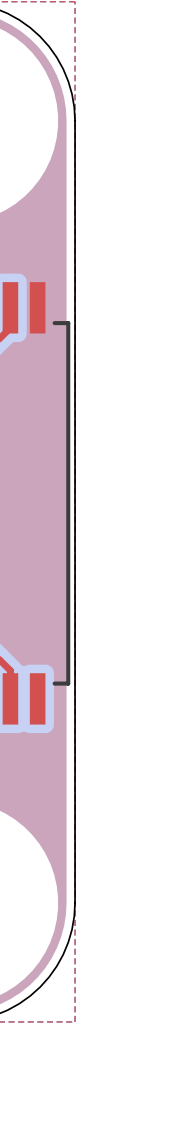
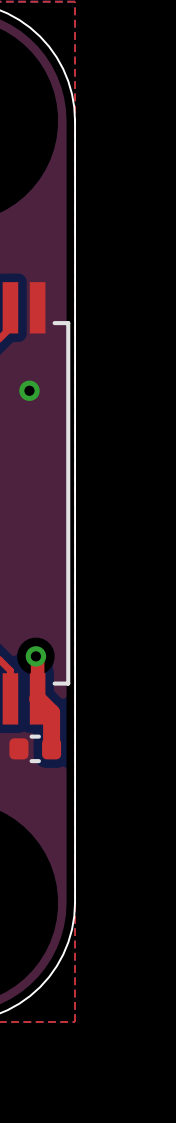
via: none -> (29, 390)
top track: none -> (35, 656) (37, 658) (37, 698) (51, 712) (51, 748)
via: none -> (35, 656)
part: none -> (35, 748)

